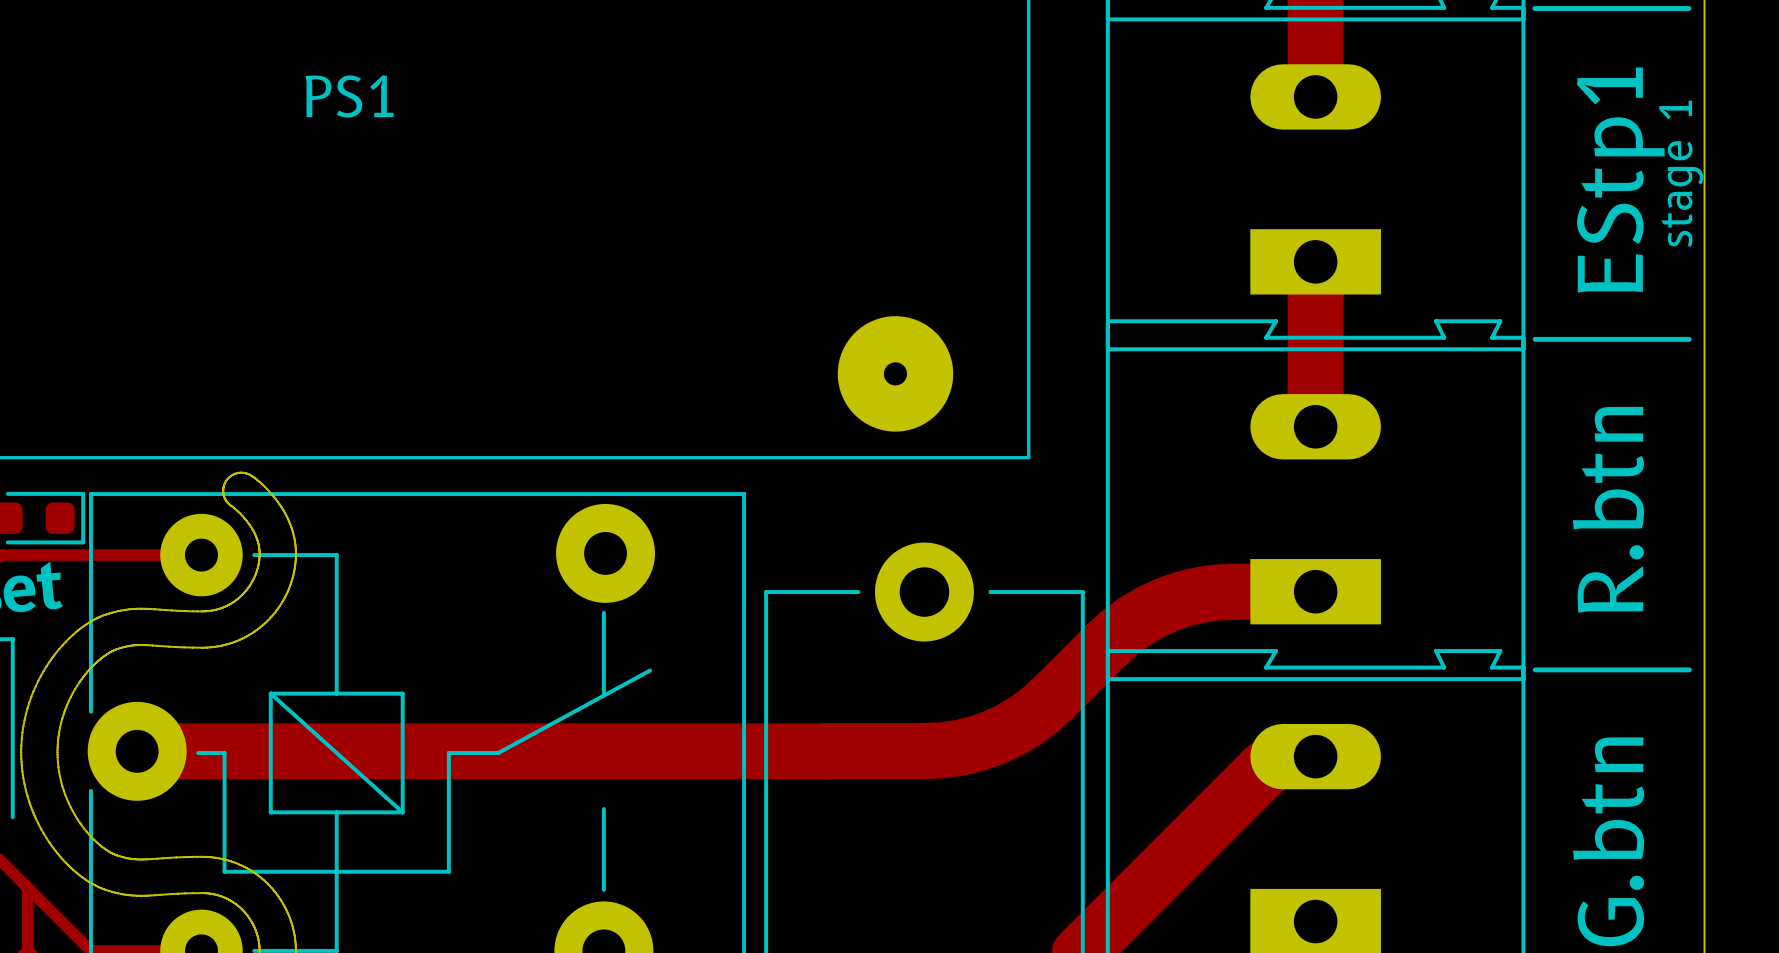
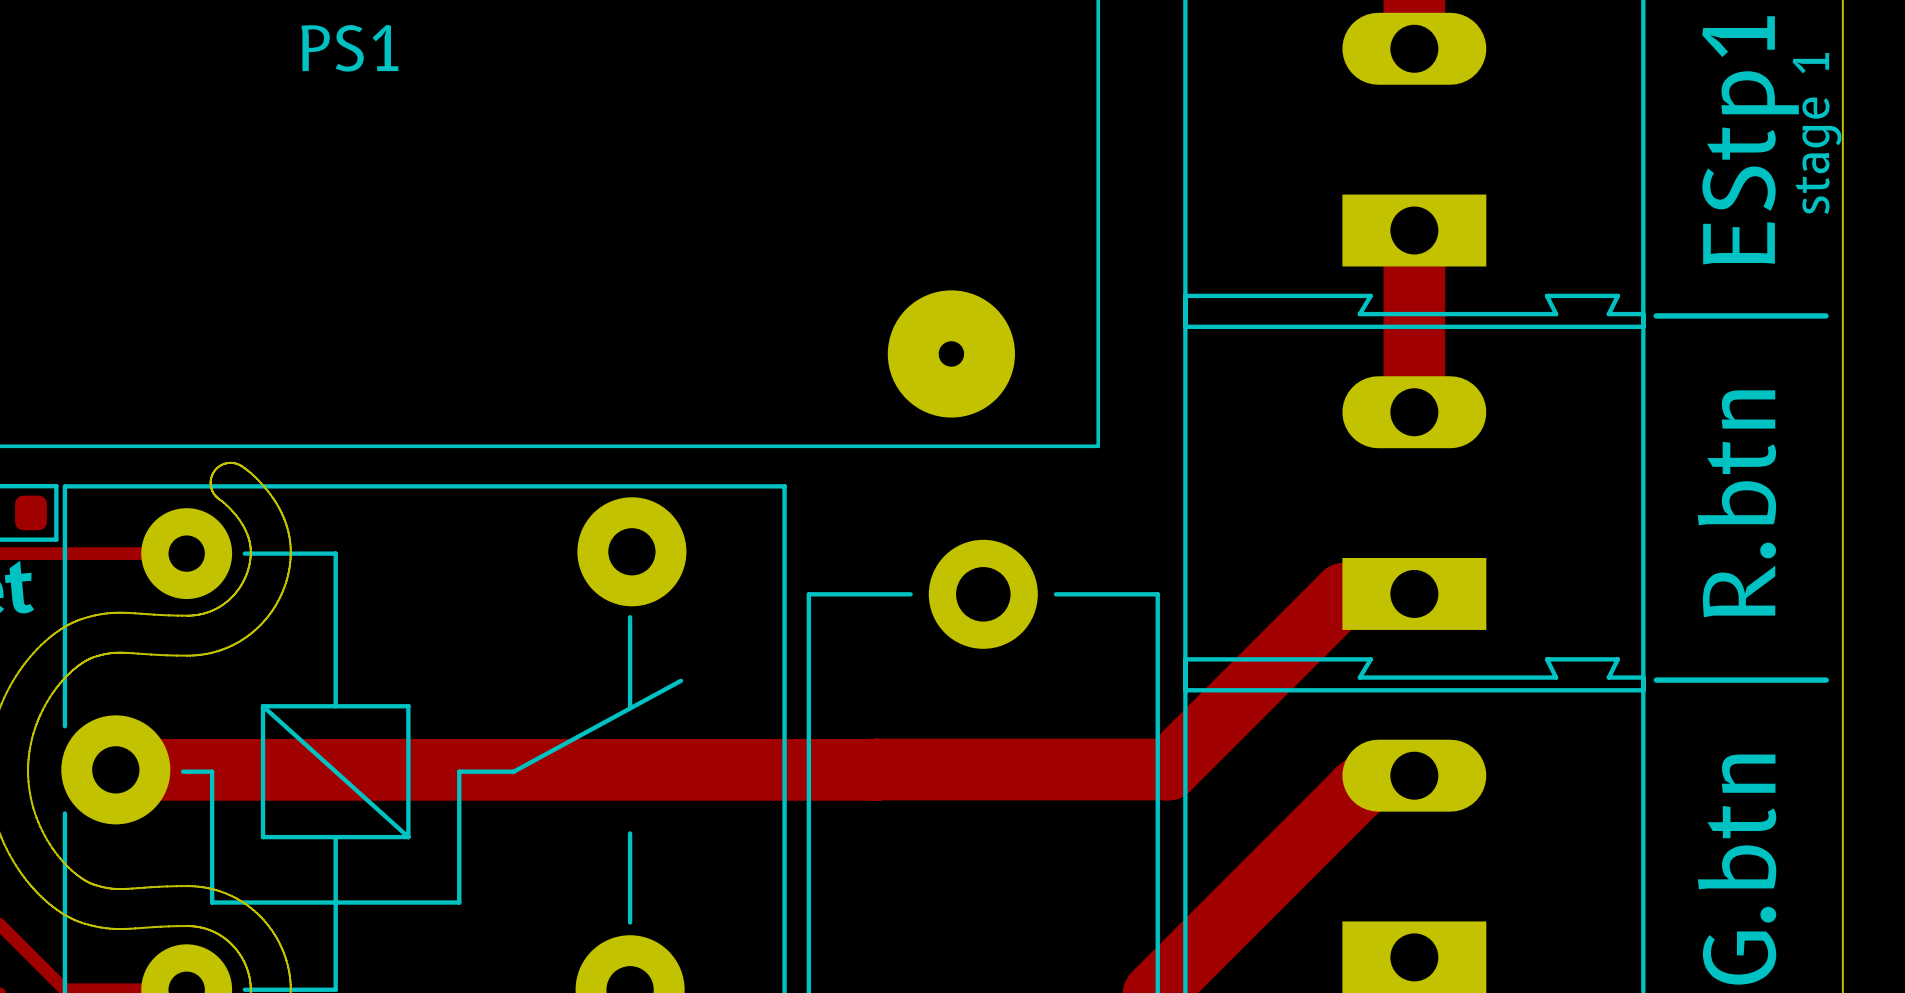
track: (1251, 591) (1198, 595) (1181, 599) (1149, 612) (1120, 632) (1052, 698) (1025, 720) (994, 737) (978, 743) (960, 747) (925, 751) -> (1343, 593) (1168, 769) (984, 769)

